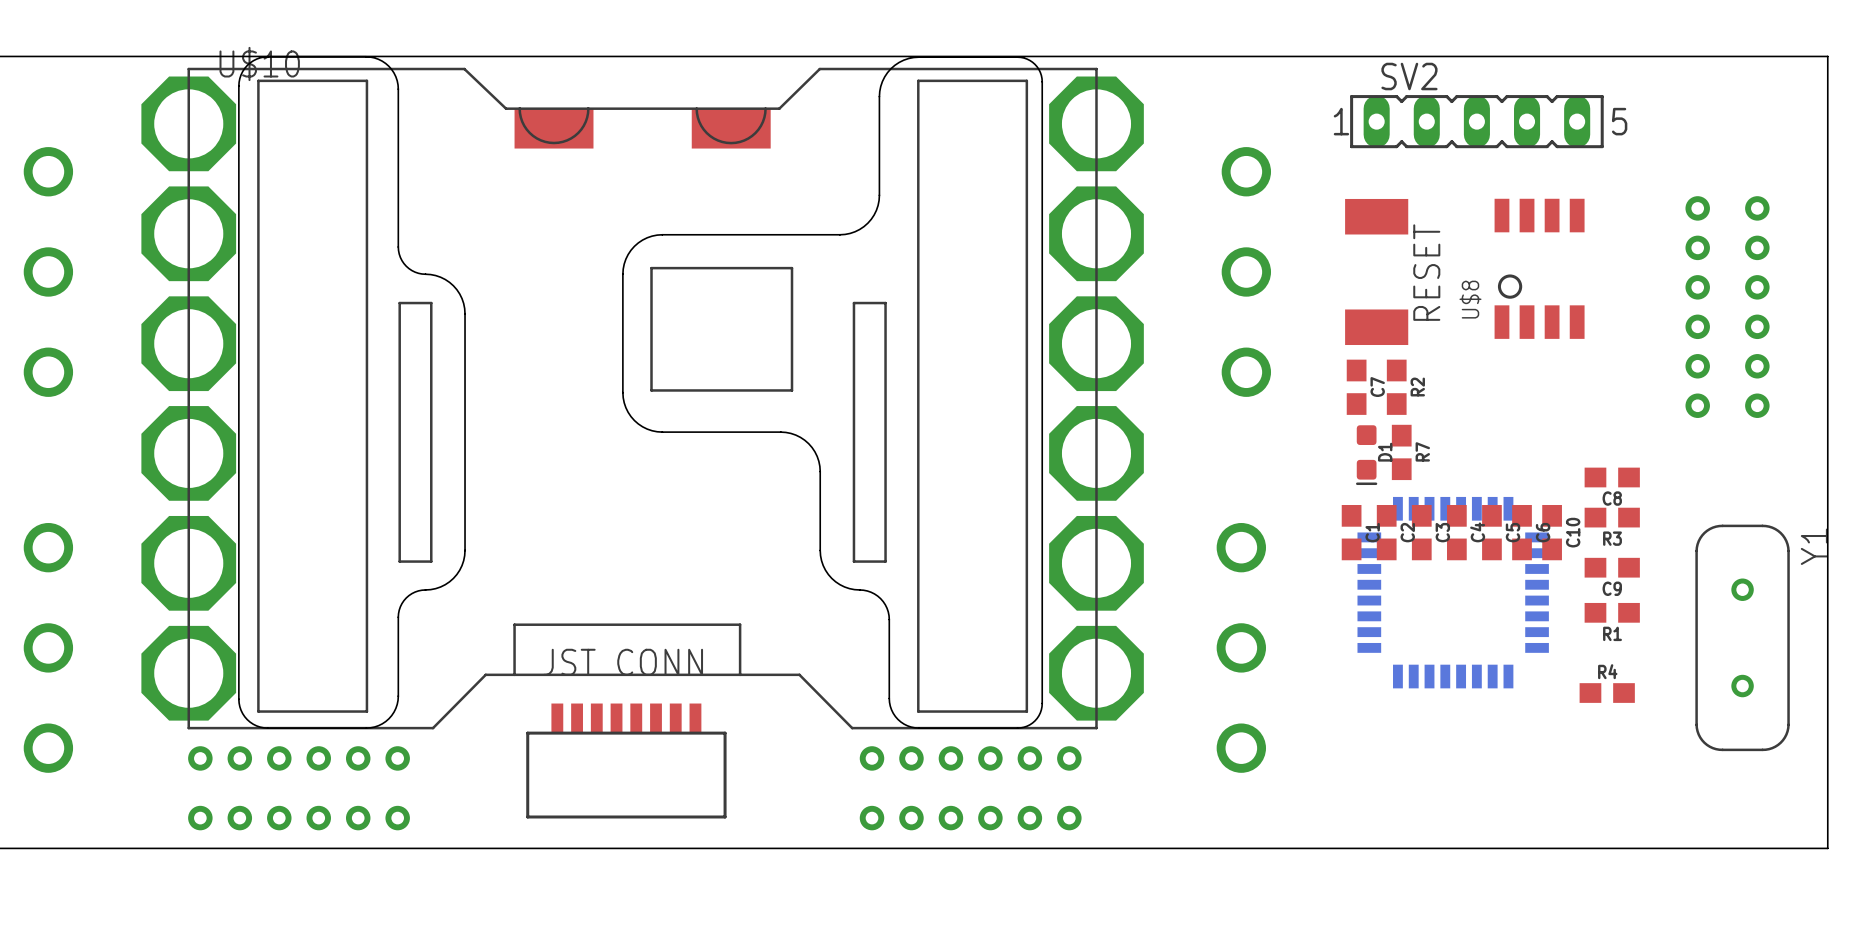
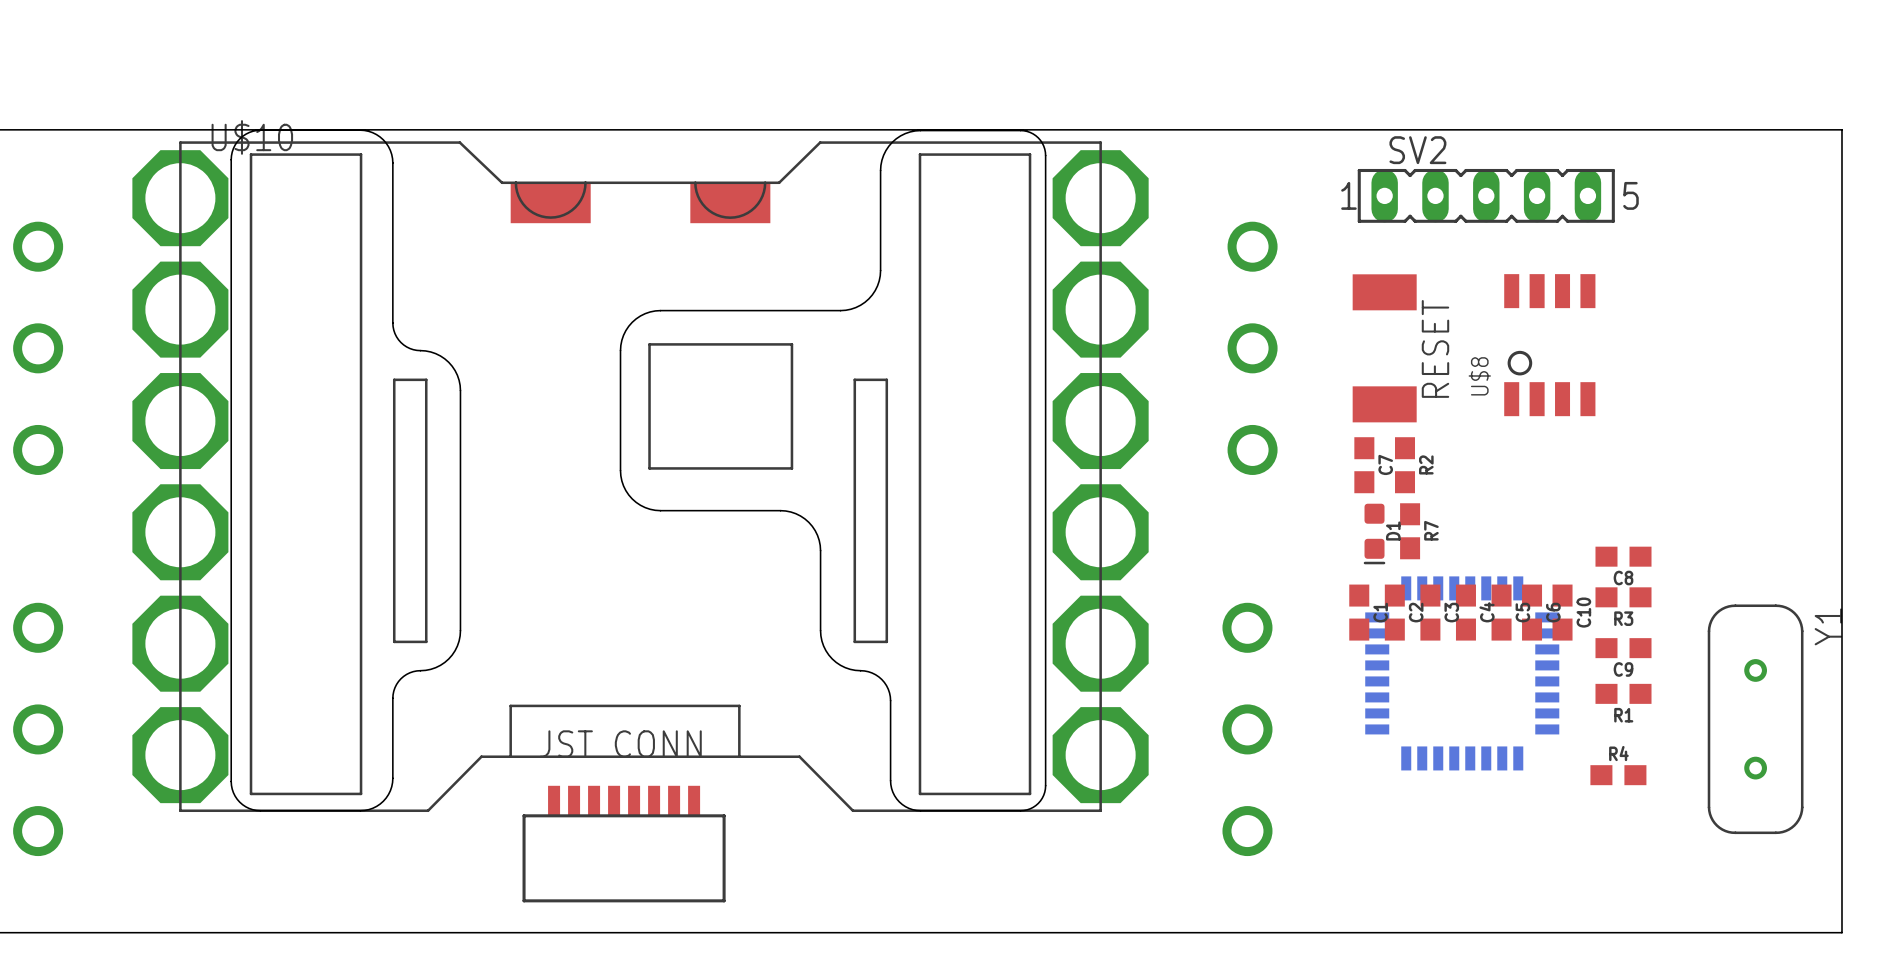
part: (1727, 307) -> none
part: (299, 788) -> none
part: (970, 788) -> none

